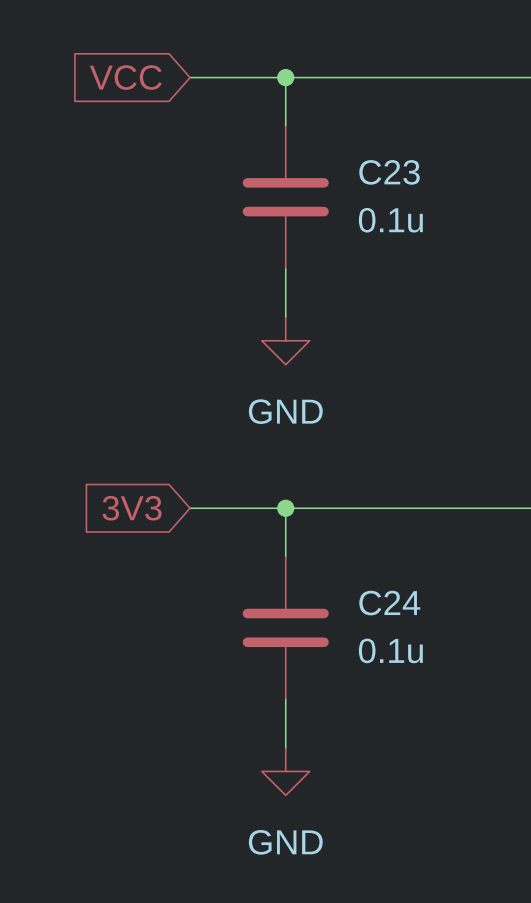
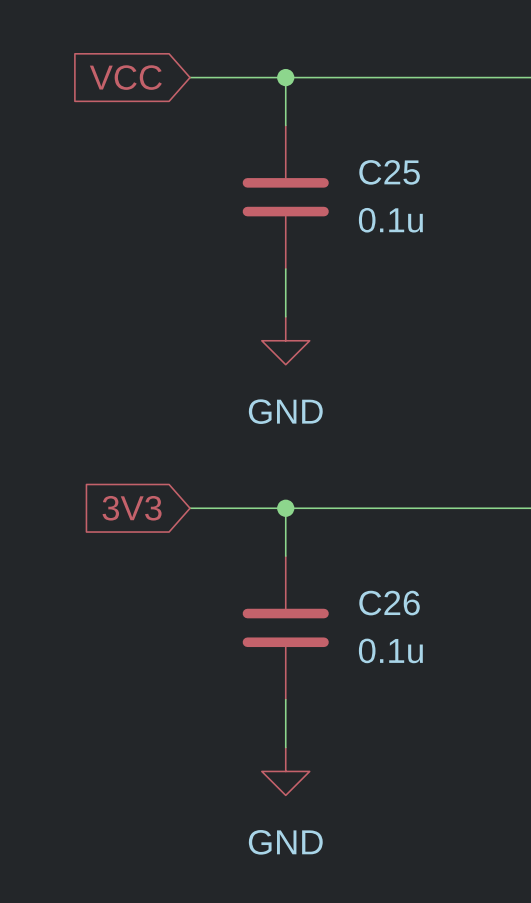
C23 name: C23 (389, 172) -> C25 (389, 172)
C24 name: C24 (389, 603) -> C26 (389, 603)

